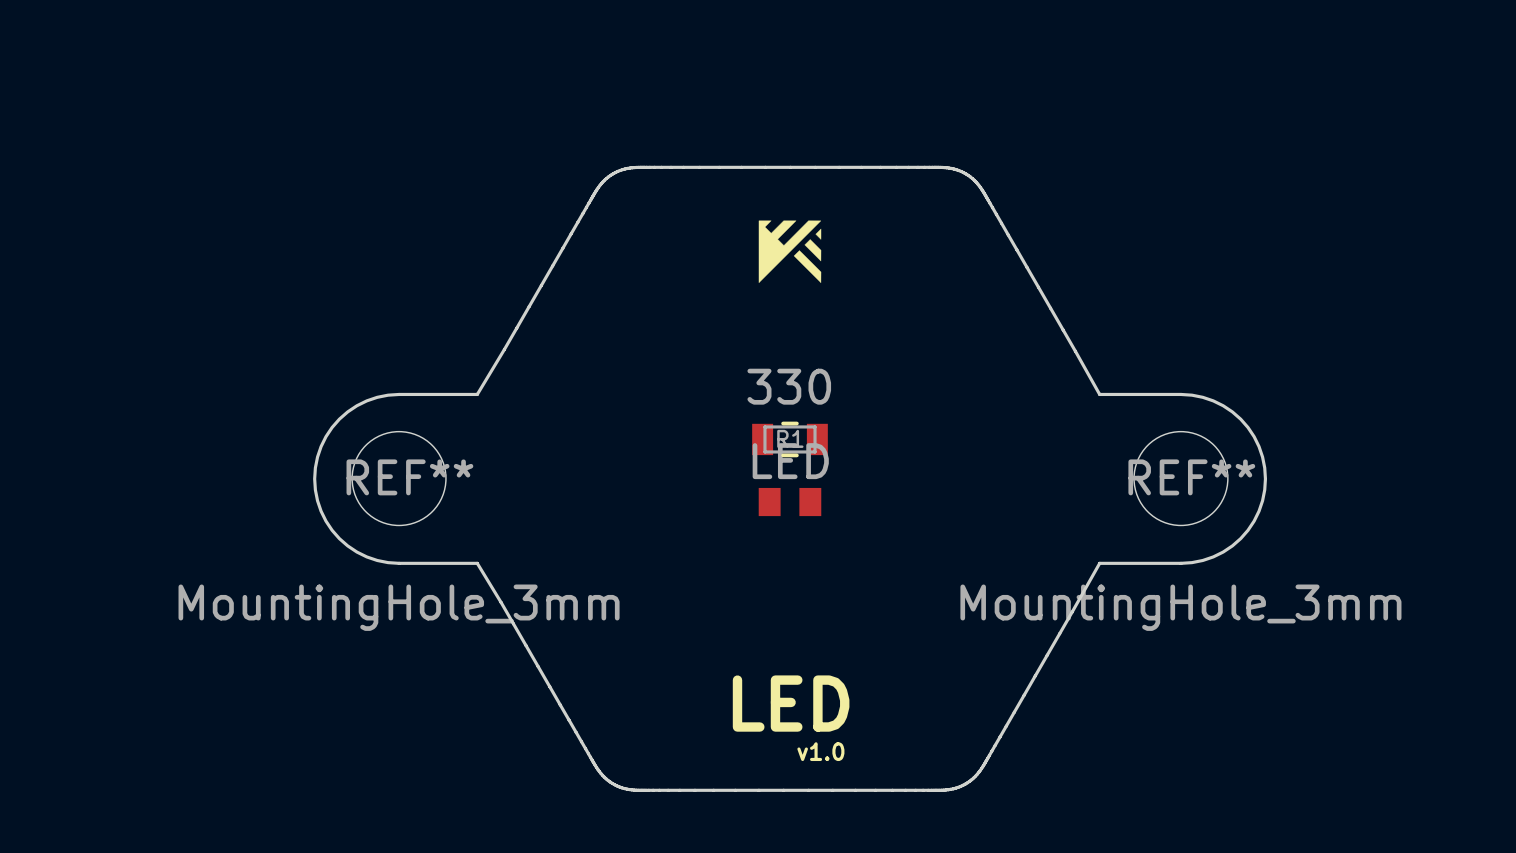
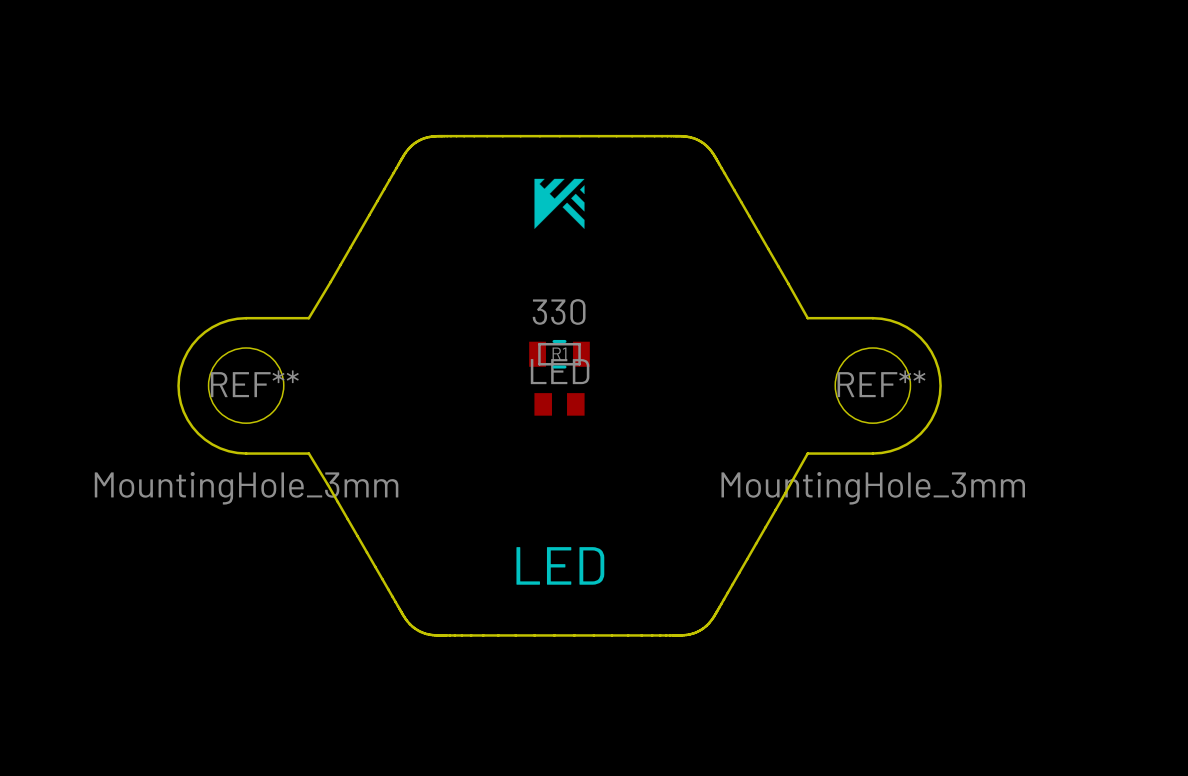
text: v1.0 (820, 751) -> none

